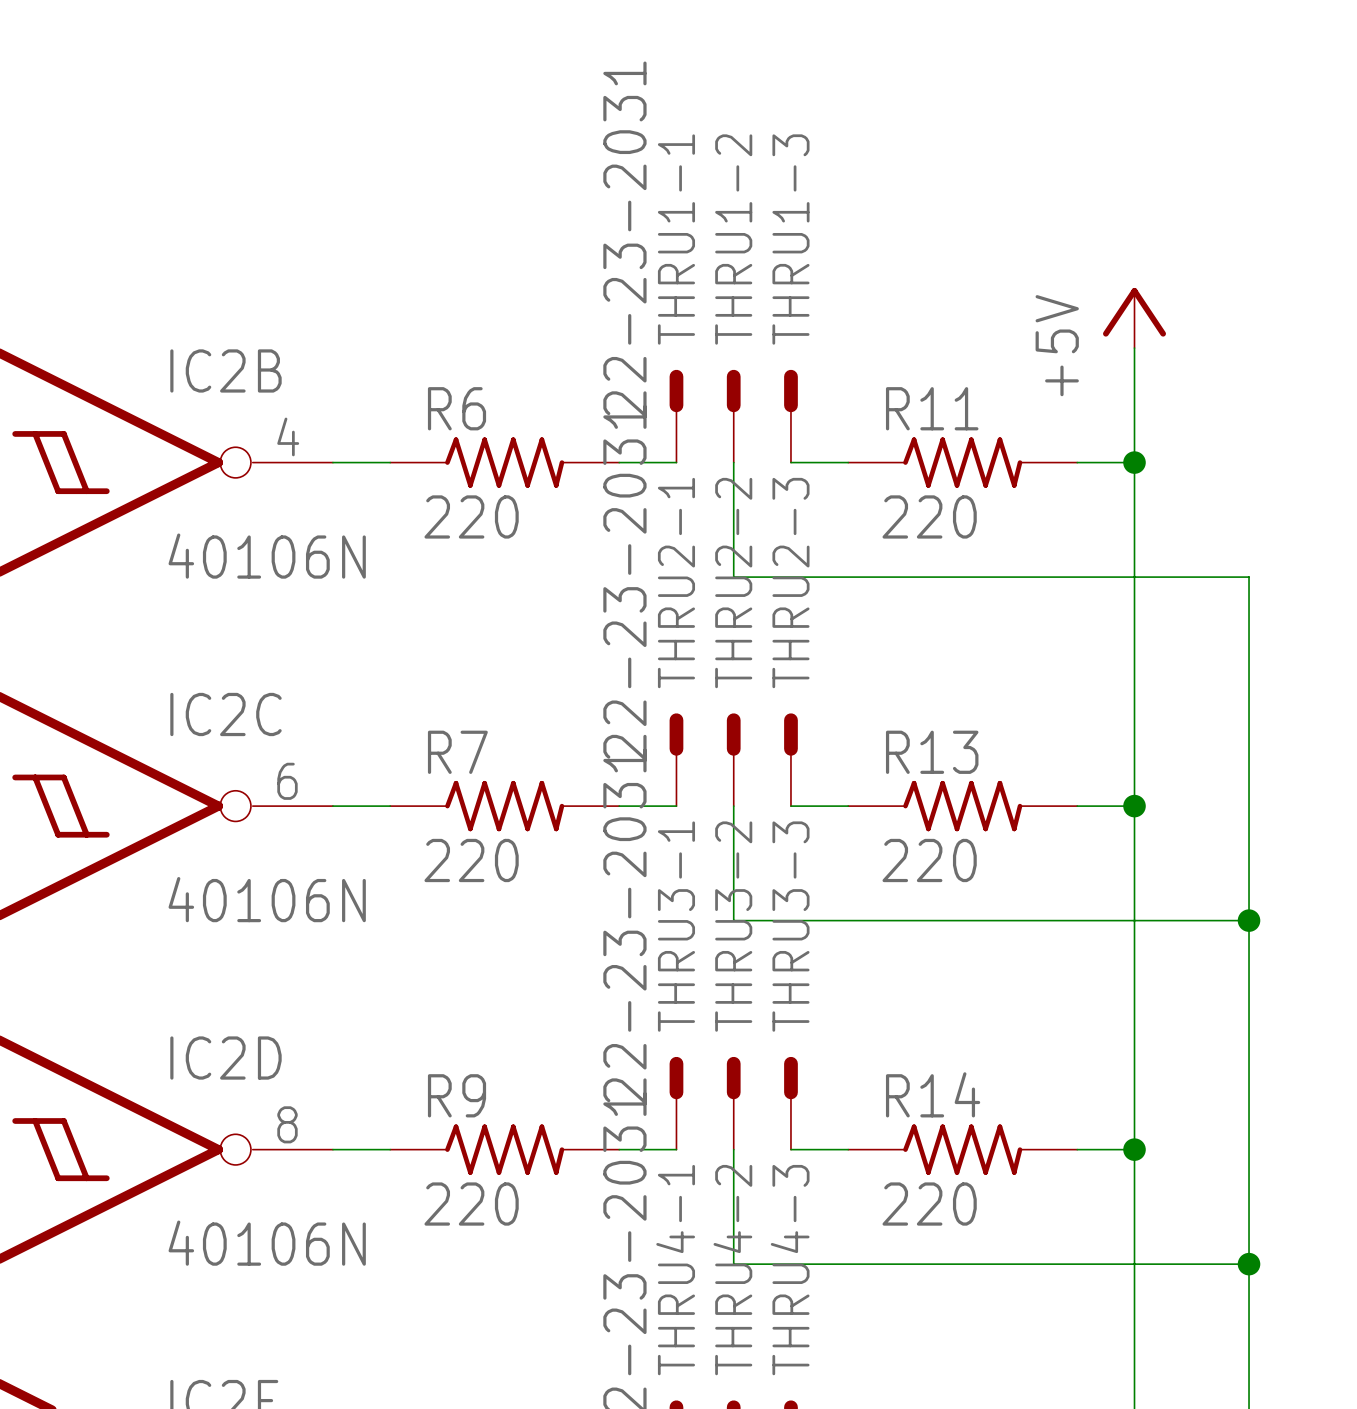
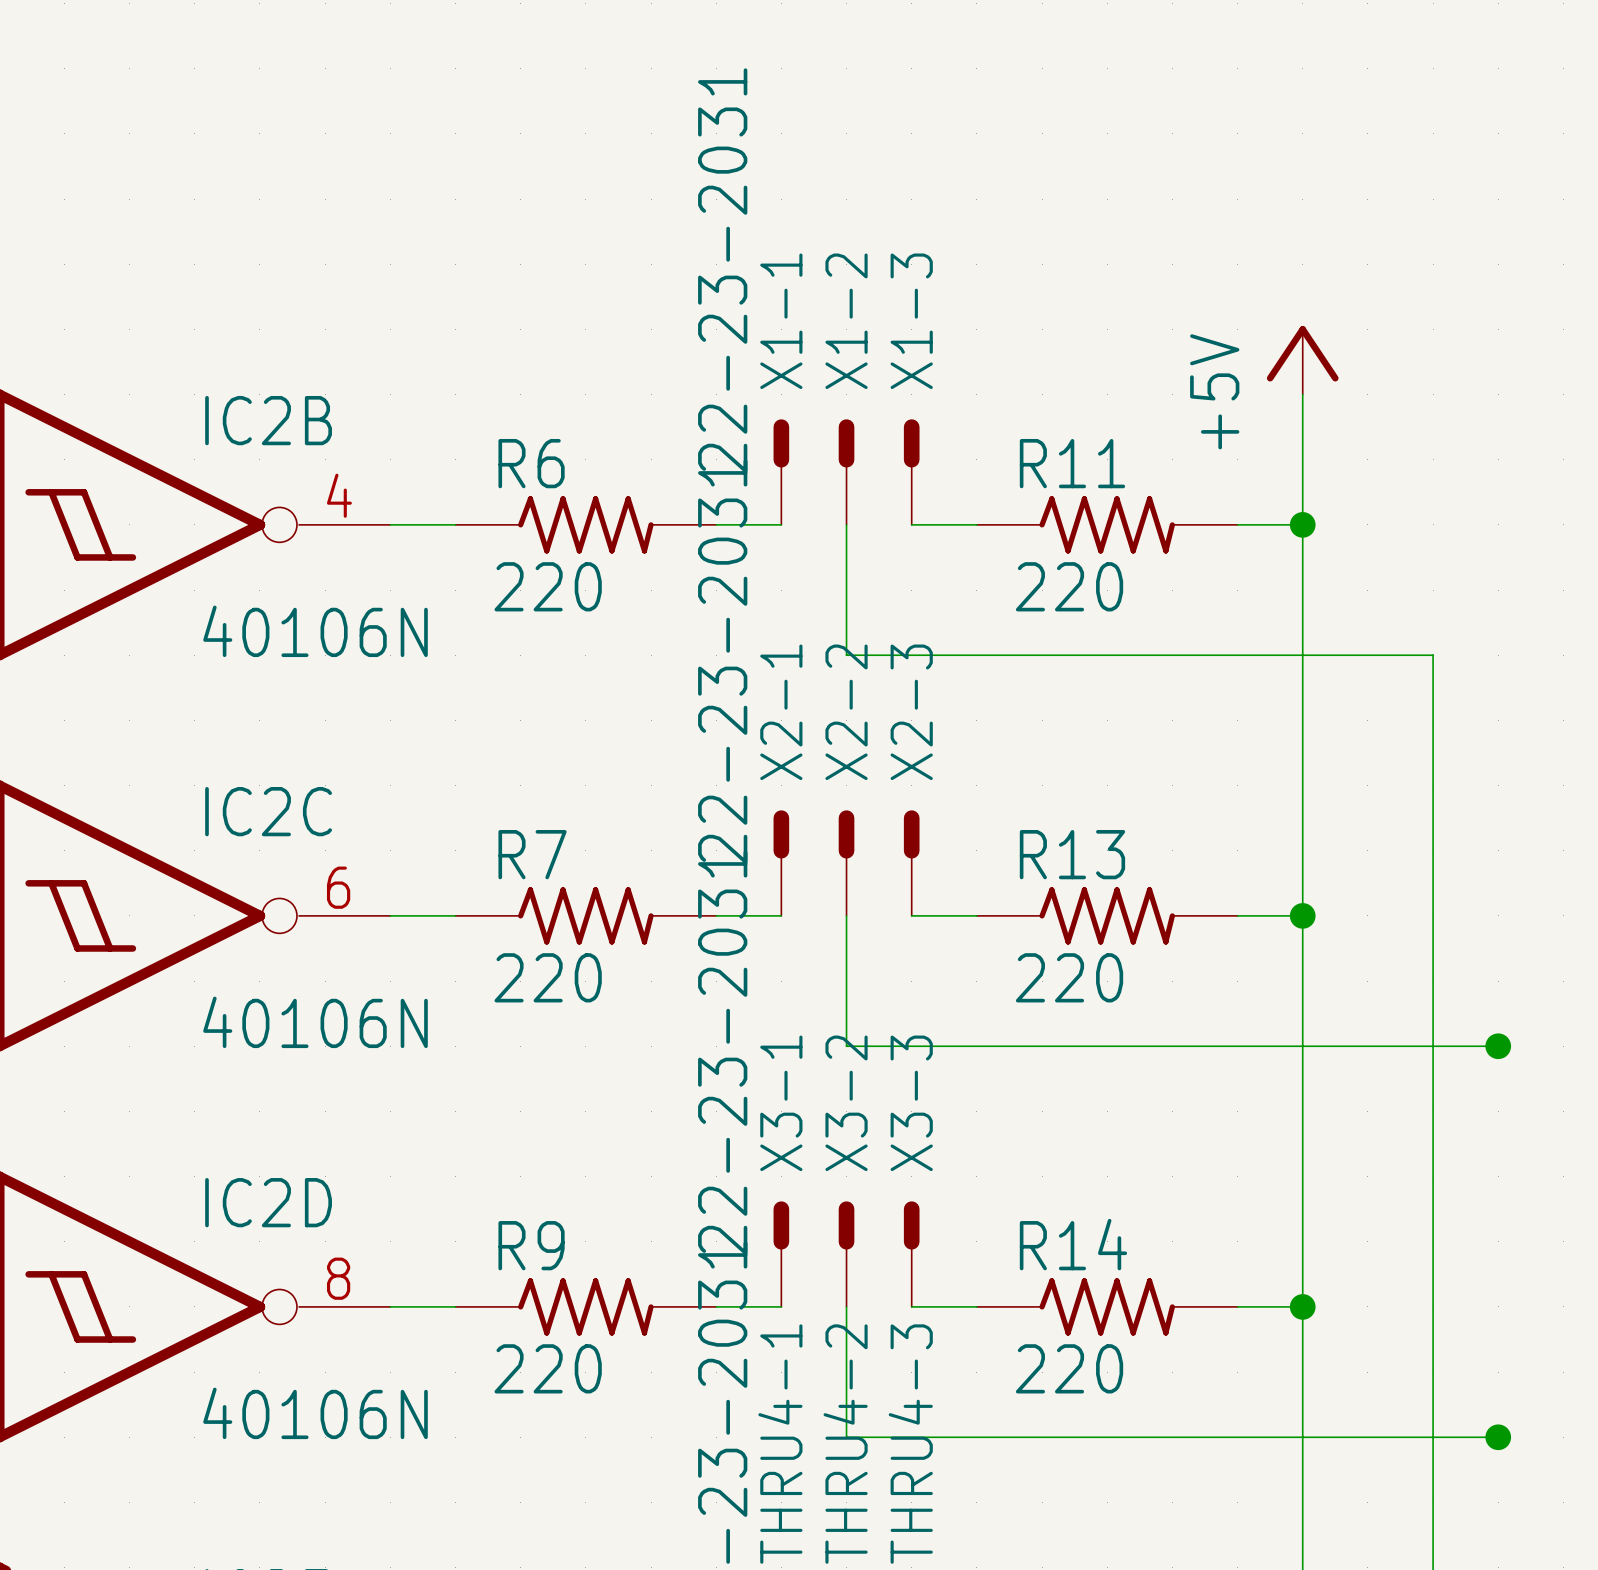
THRU1-1 name: THRU1-1 (676, 239) -> X1-1 (781, 321)
THRU1-2 name: THRU1-2 (733, 239) -> X1-2 (846, 321)
THRU1-3 name: THRU1-3 (790, 239) -> X1-3 (911, 321)
THRU2-1 name: THRU2-1 (676, 583) -> X2-1 (781, 712)
THRU2-2 name: THRU2-2 (733, 583) -> X2-2 (846, 712)
THRU2-3 name: THRU2-3 (790, 583) -> X2-3 (911, 712)
wire: none -> (1433, 1046) (1498, 1046)
junction position: (1249, 920) -> (1498, 1046)
THRU3-1 name: THRU3-1 (676, 926) -> X3-1 (781, 1103)
THRU3-2 name: THRU3-2 (733, 926) -> X3-2 (846, 1103)
THRU3-3 name: THRU3-3 (790, 926) -> X3-3 (911, 1103)
wire: none -> (1433, 1437) (1498, 1437)
junction position: (1249, 1264) -> (1498, 1437)

